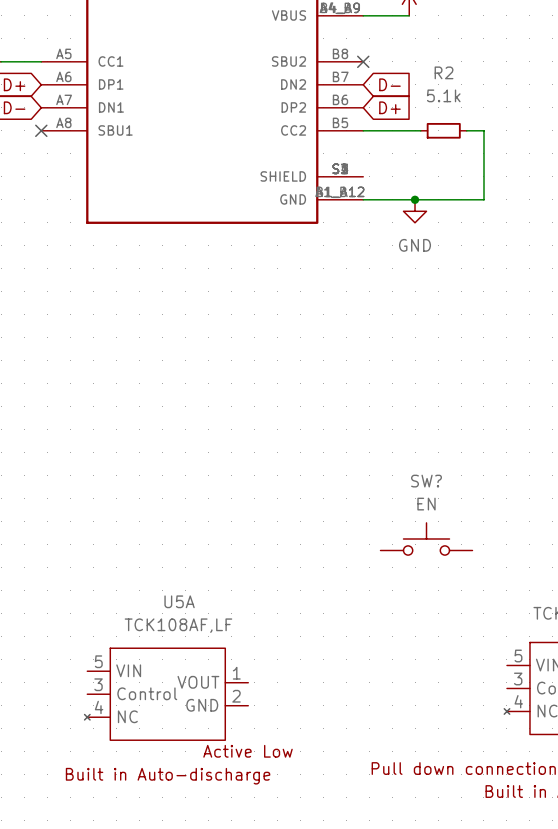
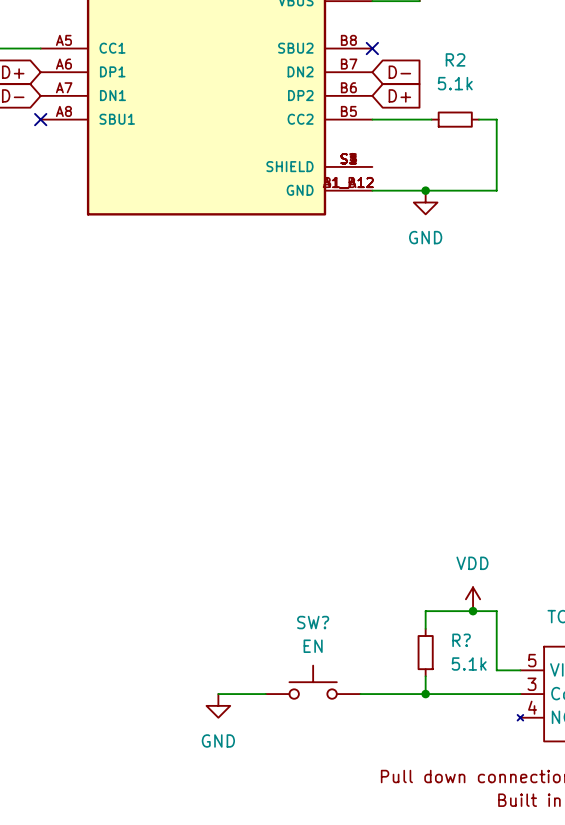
SW? position: (426, 539) -> (313, 682)
power symbol: none -> VDD (473, 599)
junction: none -> (473, 611)
wire: none -> (425, 628) (425, 611) (496, 611) (496, 670) (520, 670)
R?: none -> 5.1k (425, 652)
wire: none -> (425, 676) (425, 694)
wire: none -> (218, 694) (265, 694)
wire: none -> (360, 694) (520, 694)
junction: none -> (425, 694)
U5A: TCK108AF,LF (166, 694) -> none
power symbol: none -> GND (218, 705)

